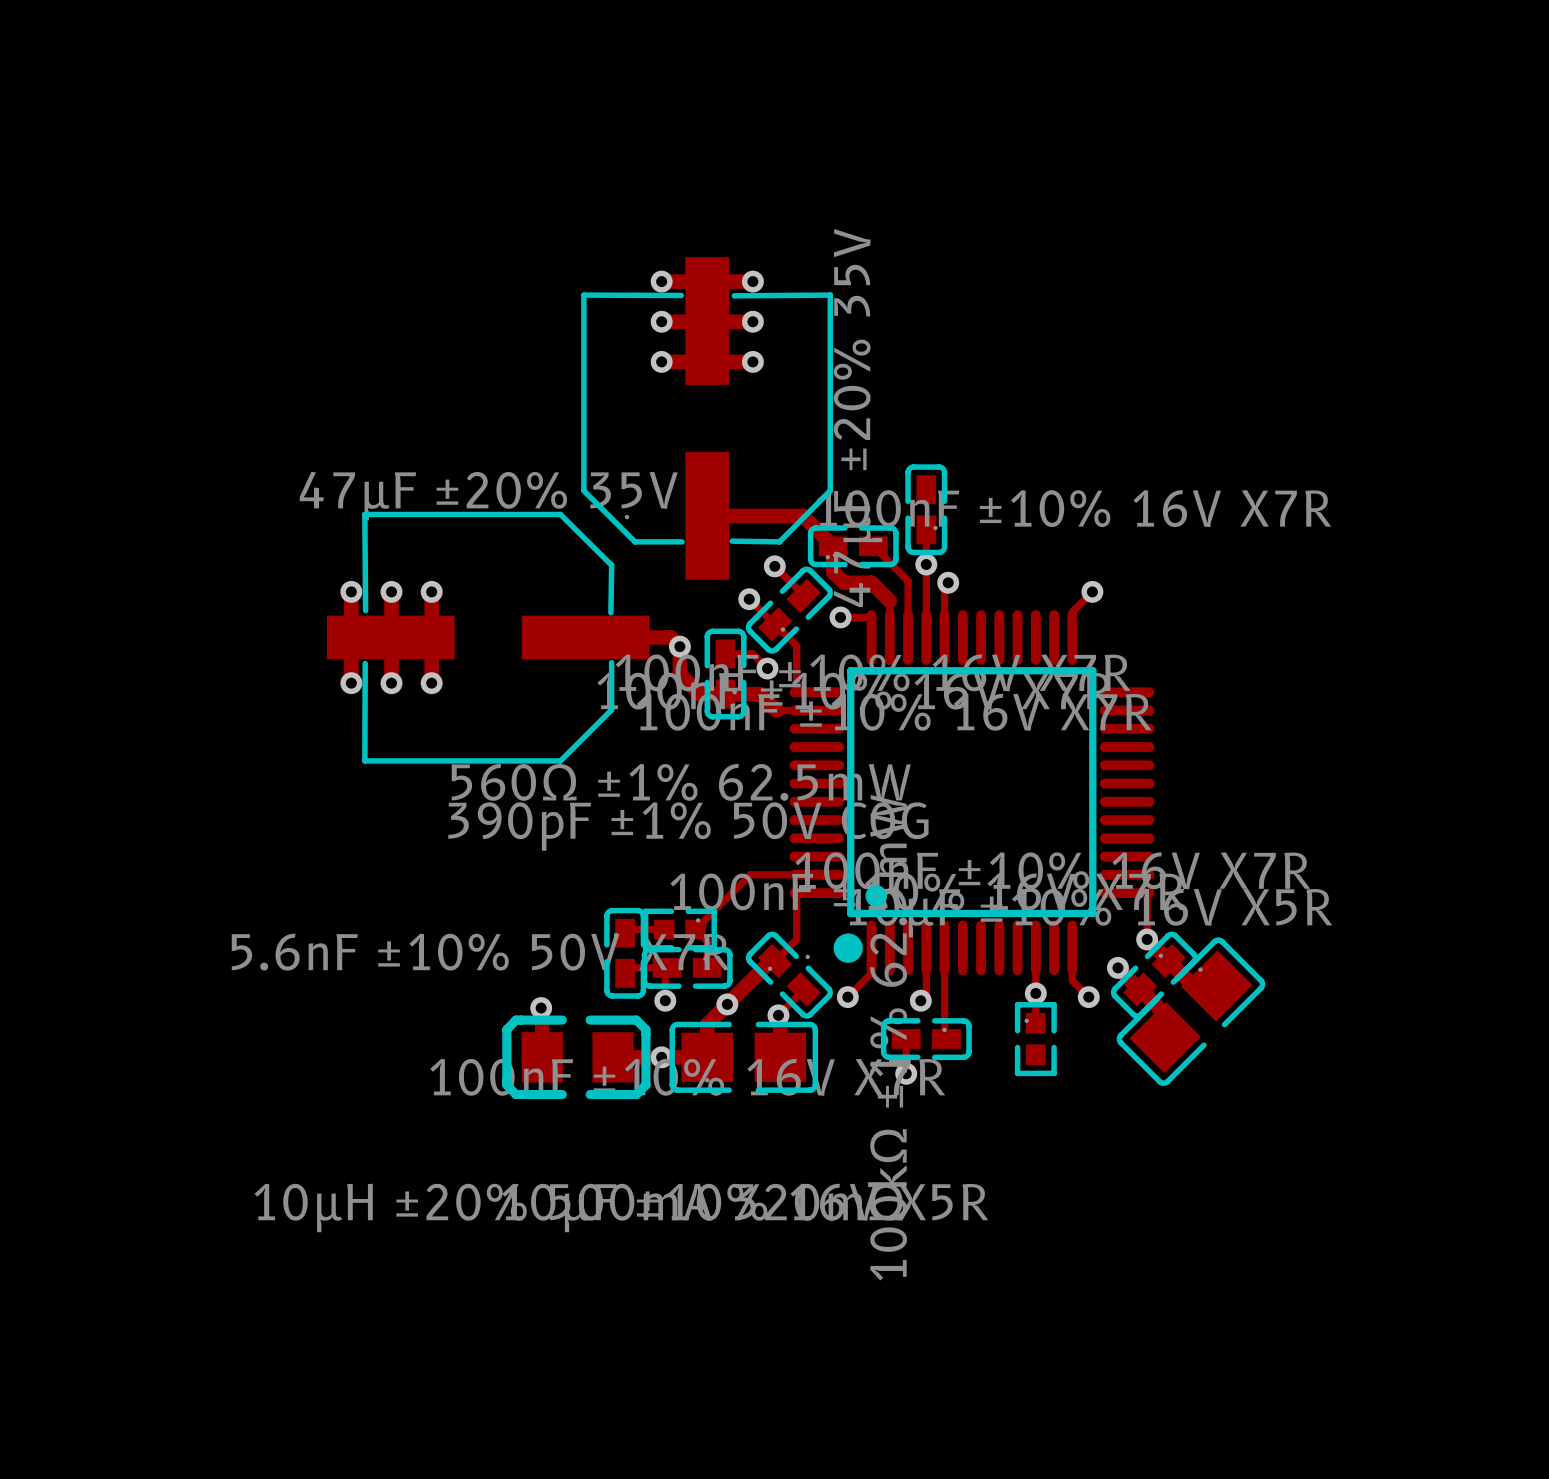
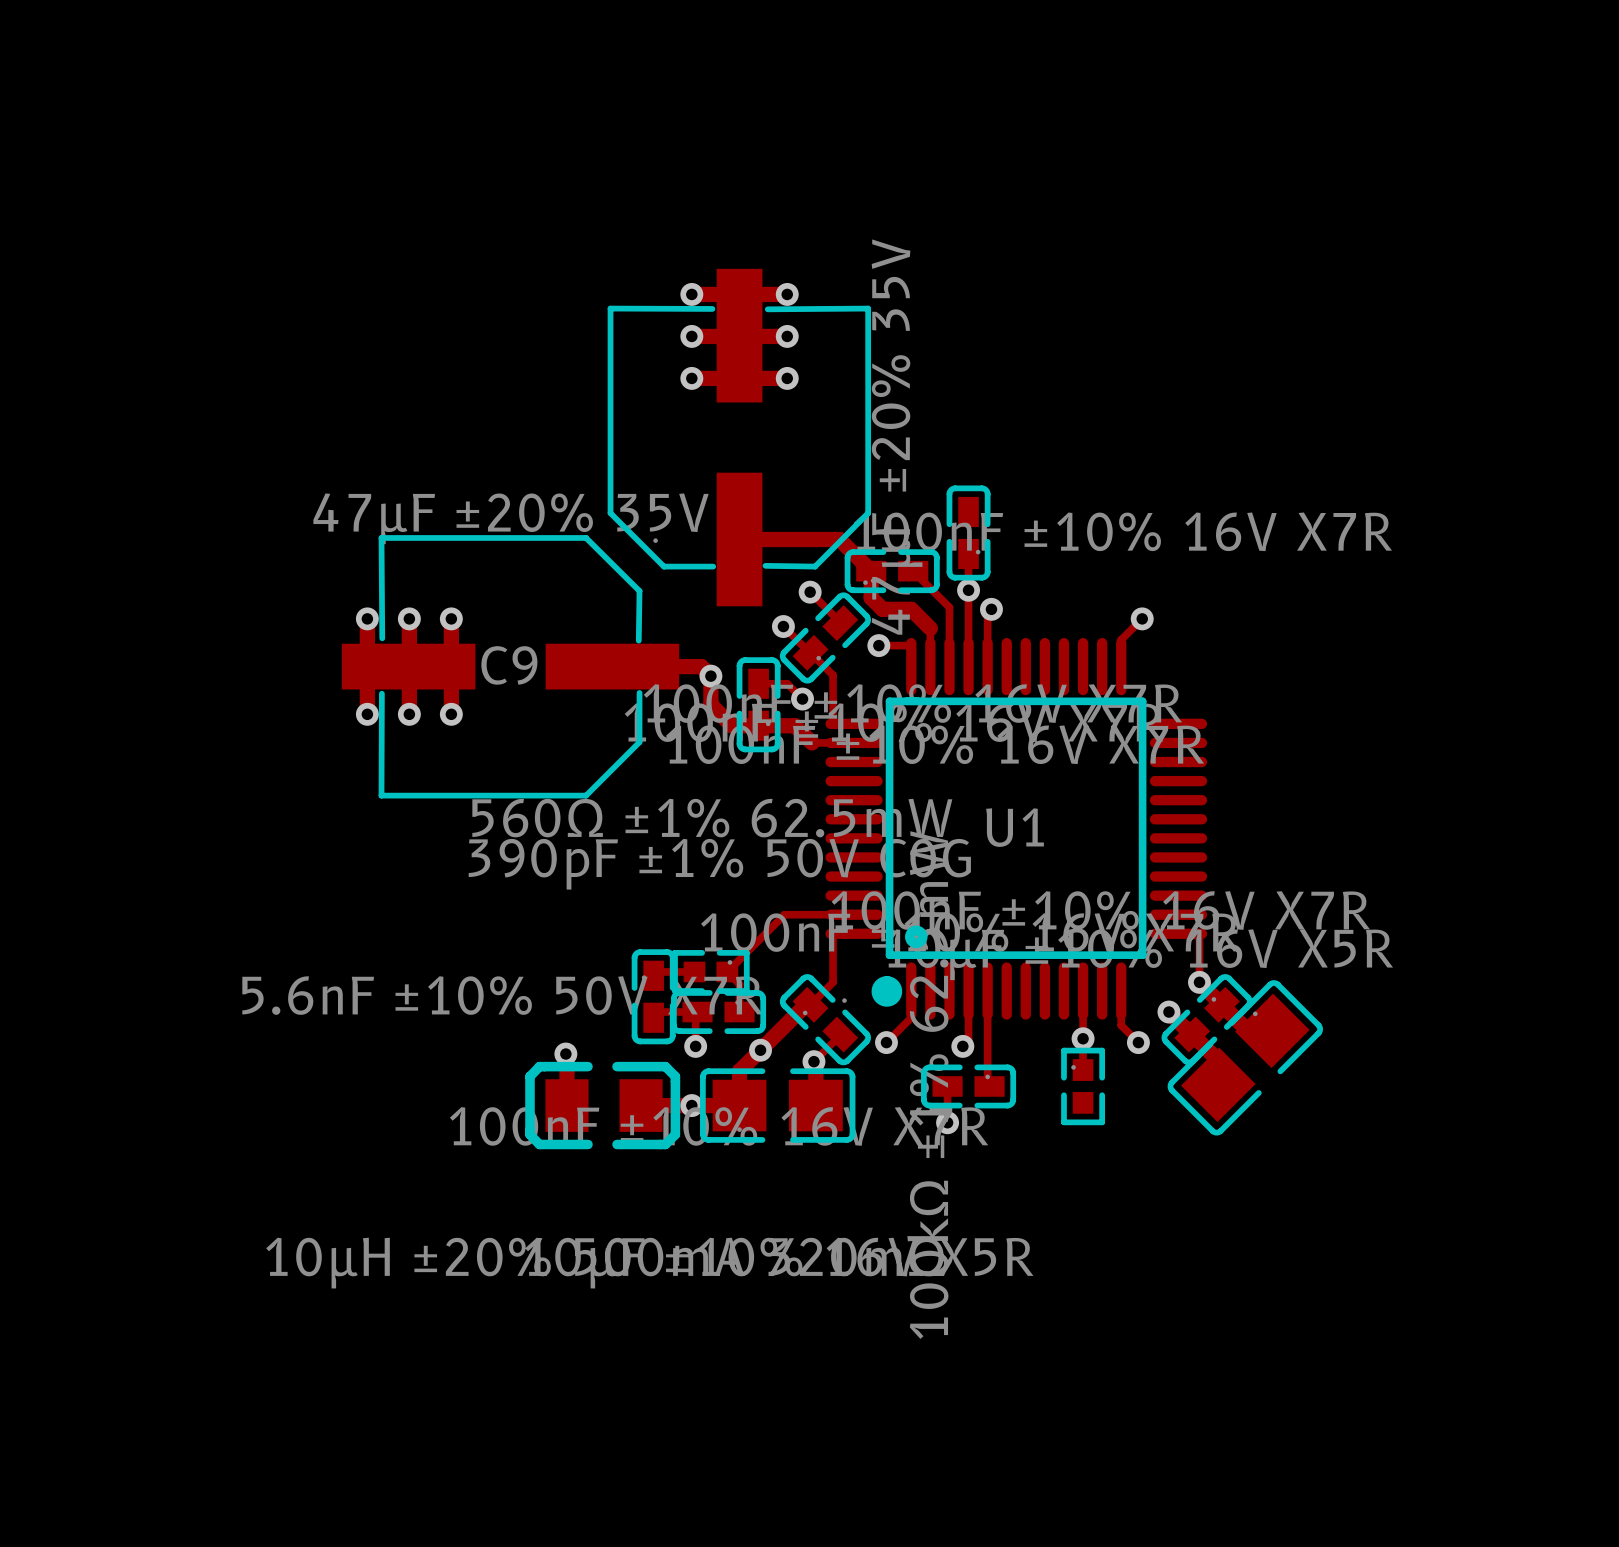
C9 name: none -> C9 (509, 665)
U1 name: none -> U1 (1015, 827)

